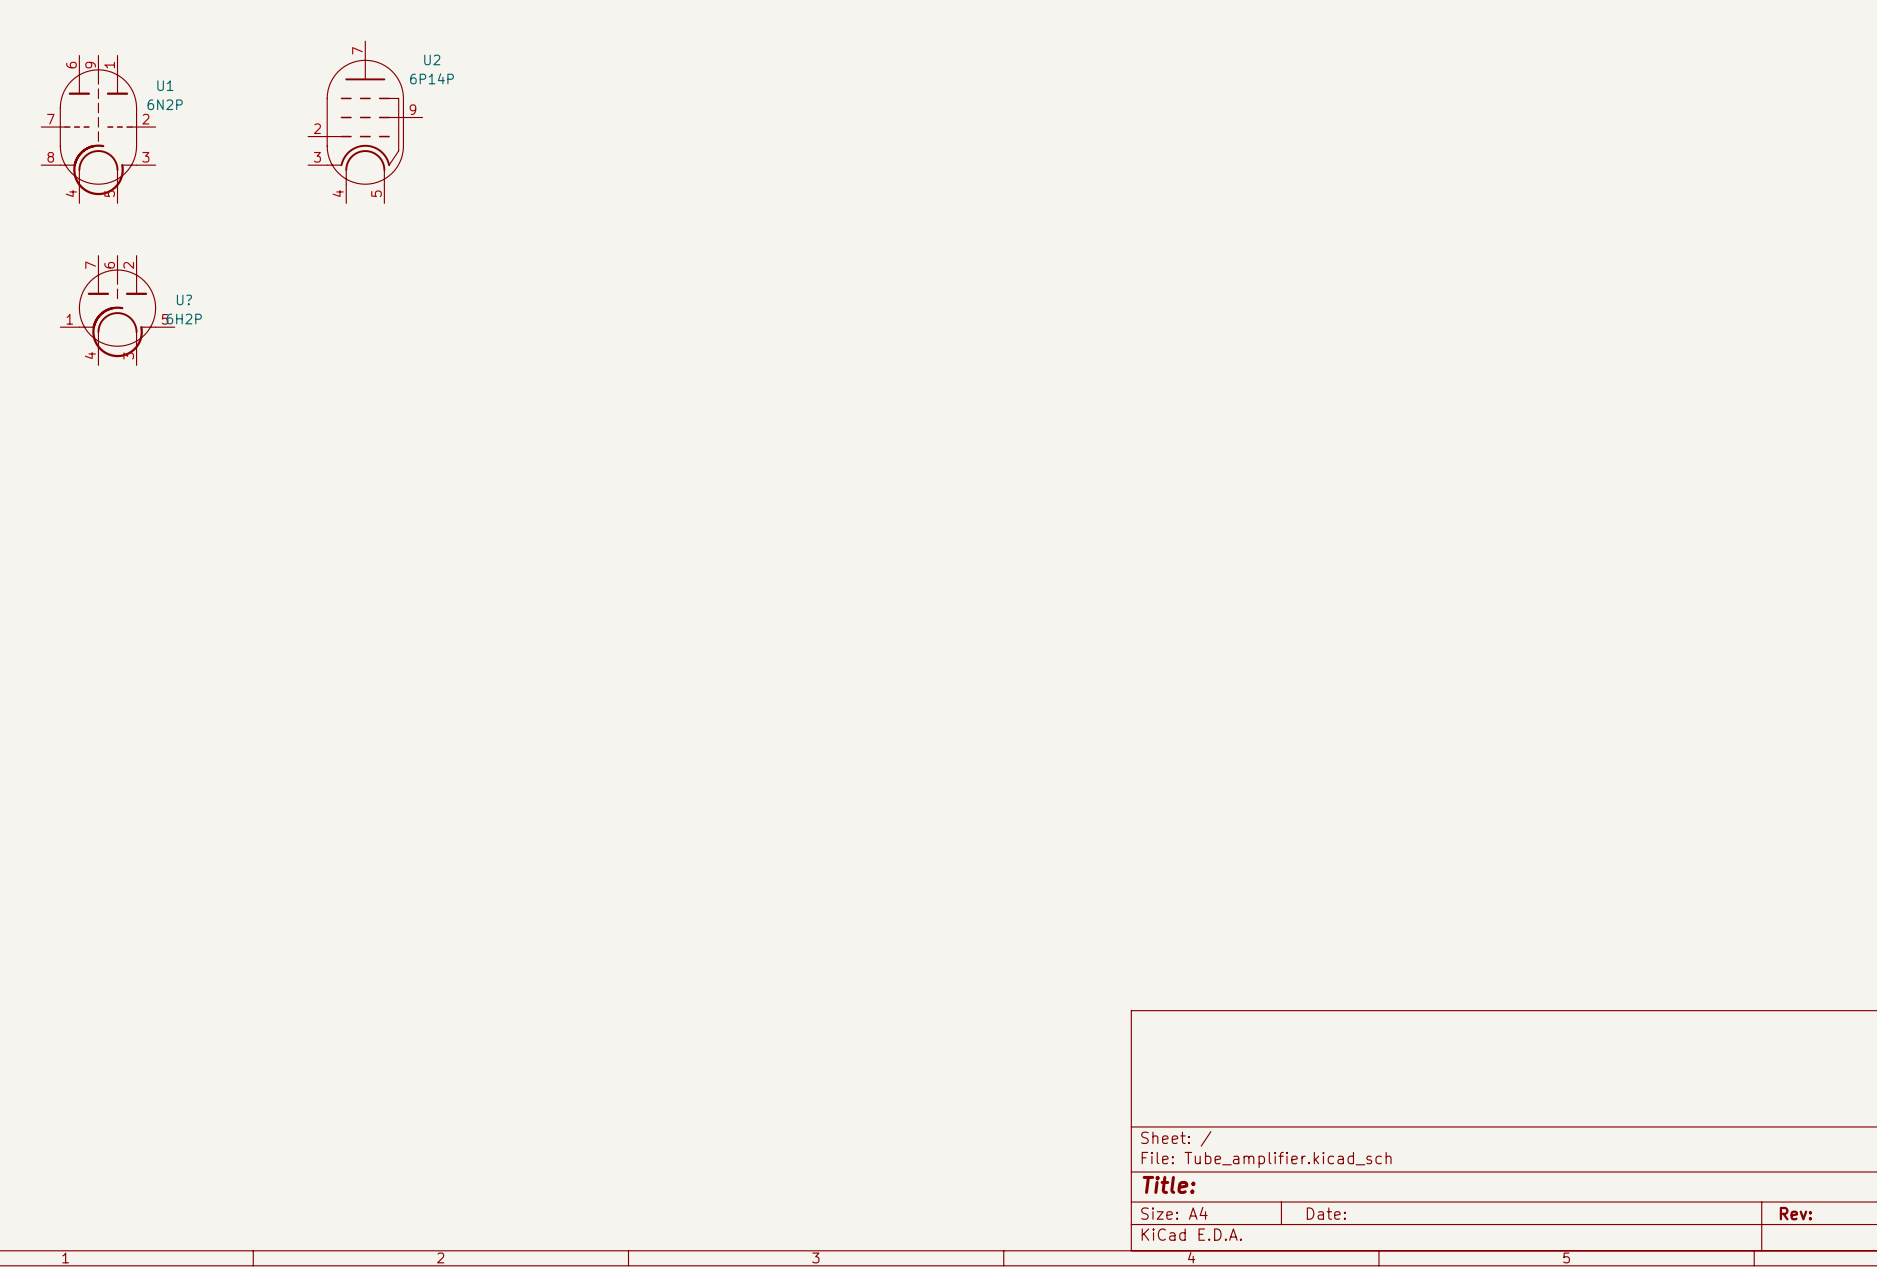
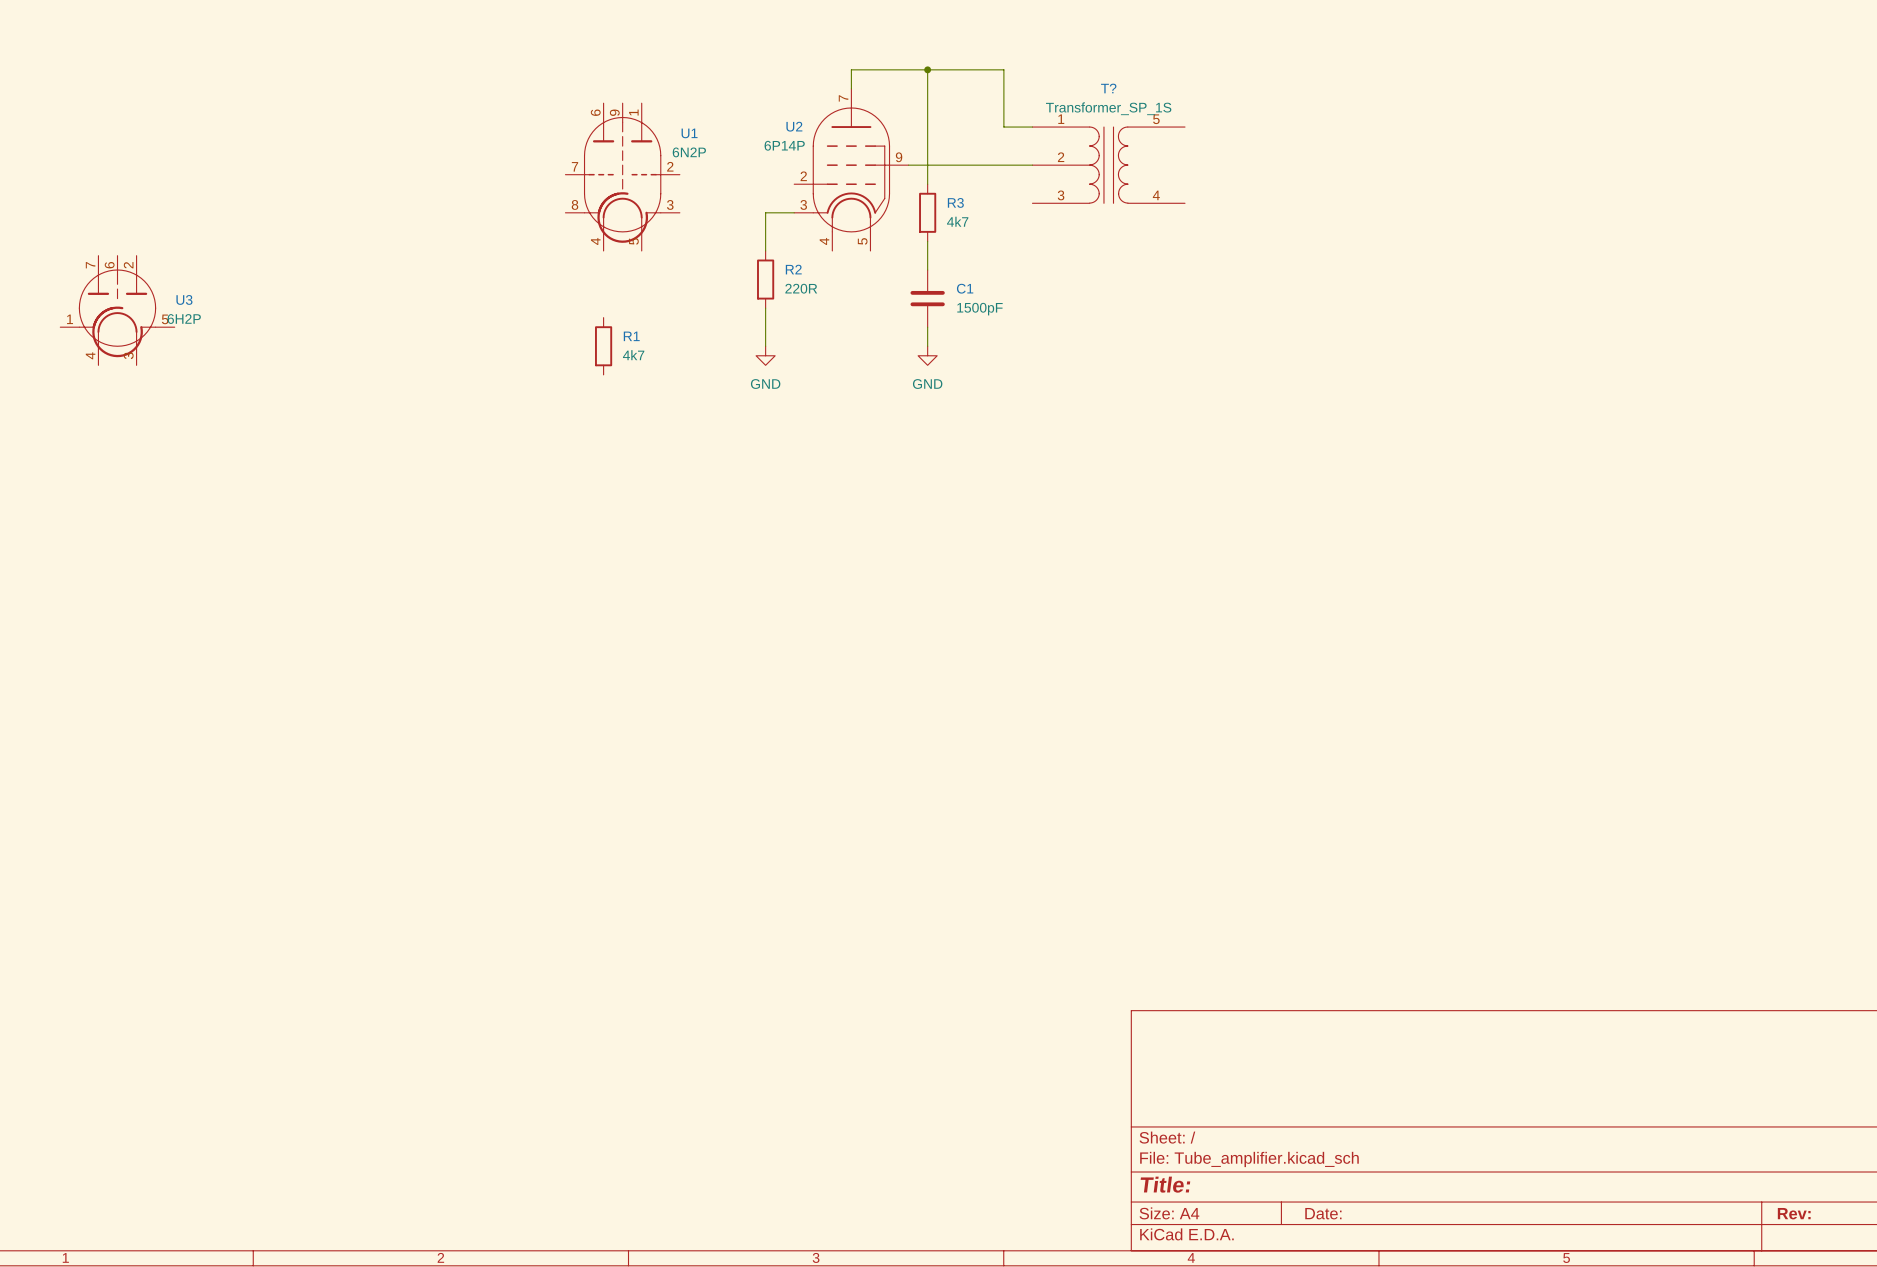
U2 name position: U2 (432, 59) -> U2 (794, 126)
wire: none -> (927, 69) (927, 184)
junction: none -> (927, 69)
U2 value position: 6P14P (432, 78) -> 6P14P (784, 145)
wire: none -> (851, 88) (851, 69) (1003, 69) (1003, 127) (1032, 127)
U2 position: (365, 122) -> (851, 169)
U1 position: (98, 129) -> (622, 177)
wire: none -> (908, 165) (1032, 165)
T?: none -> Transformer_SP_1S (1108, 165)
wire: none -> (794, 212) (765, 212) (765, 250)
R3: none -> 4k7 (927, 212)
wire: none -> (927, 241) (927, 270)
R2: none -> 220R (765, 279)
C1: none -> 1500pF (927, 298)
U? name: U? (184, 299) -> U3 (184, 299)
wire: none -> (765, 308) (765, 346)
wire: none -> (927, 327) (927, 346)
R1: none -> 4k7 (603, 346)
power symbol: none -> GND (765, 355)
power symbol: none -> GND (927, 355)

